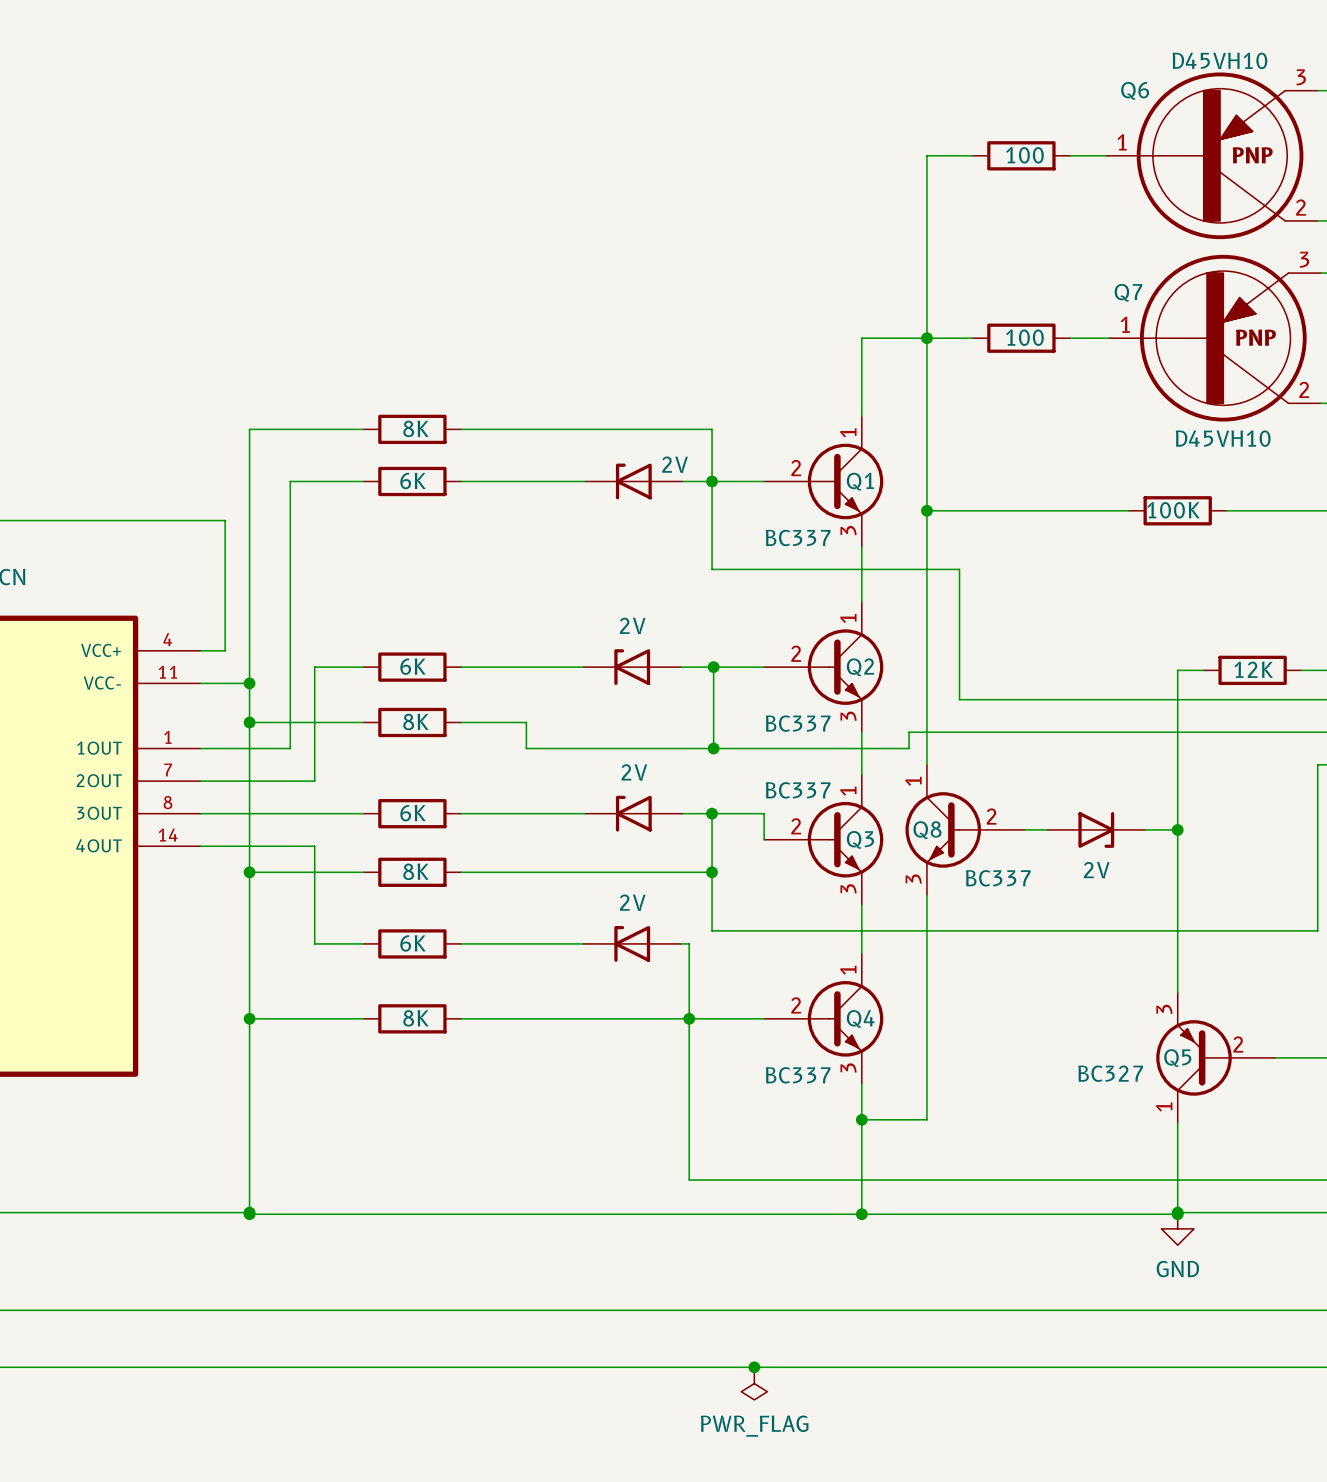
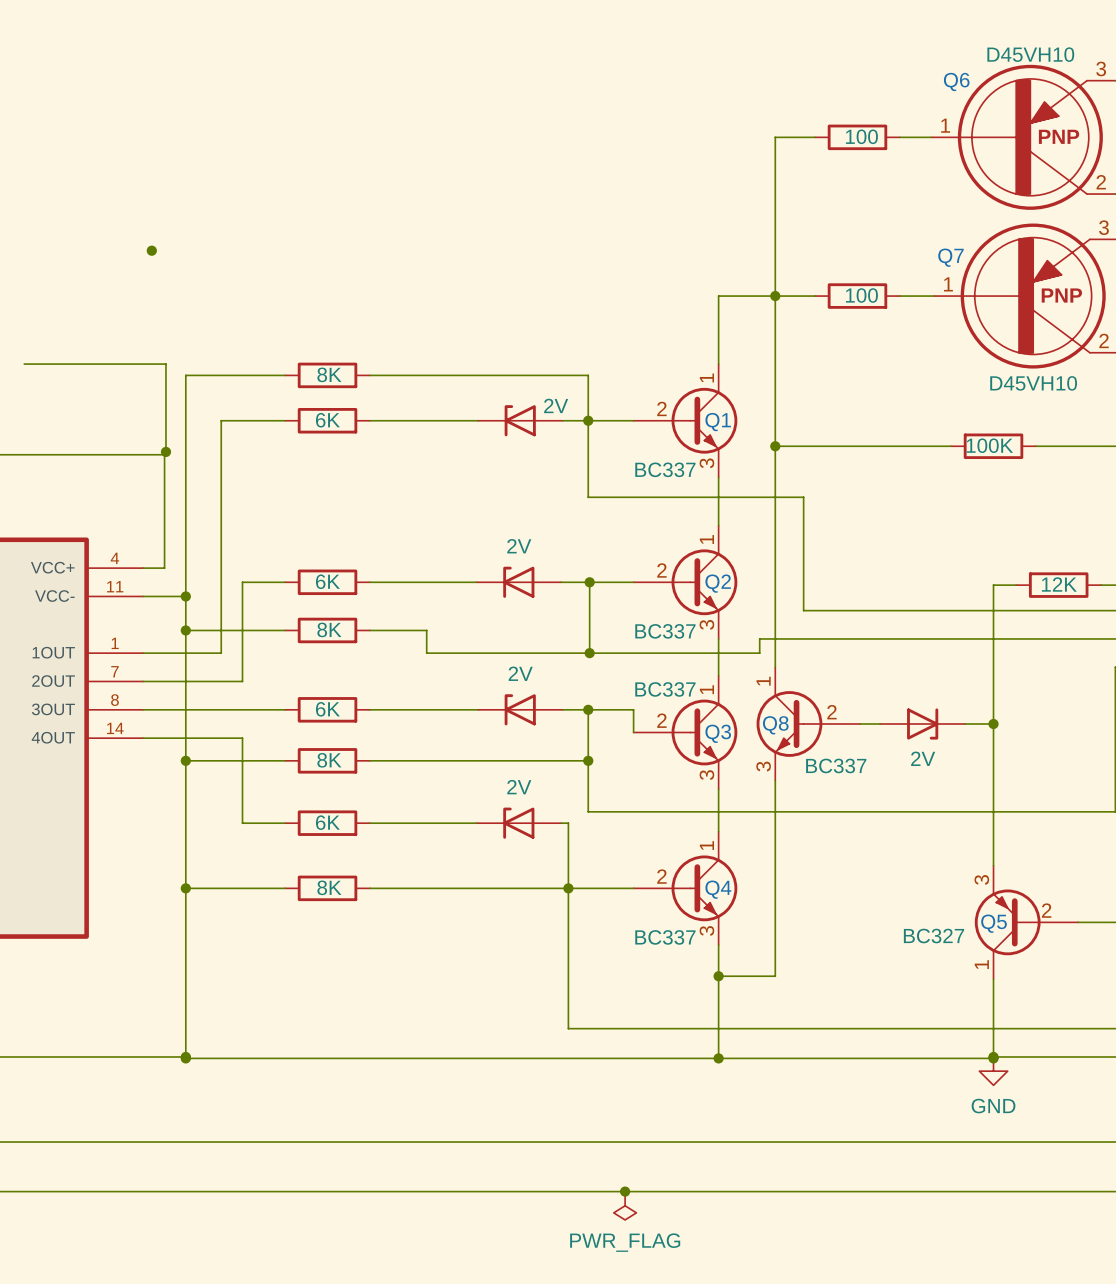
junction: none -> (151, 250)
wire: none -> (24, 364) (165, 364) (165, 454)
junction: none -> (165, 451)

